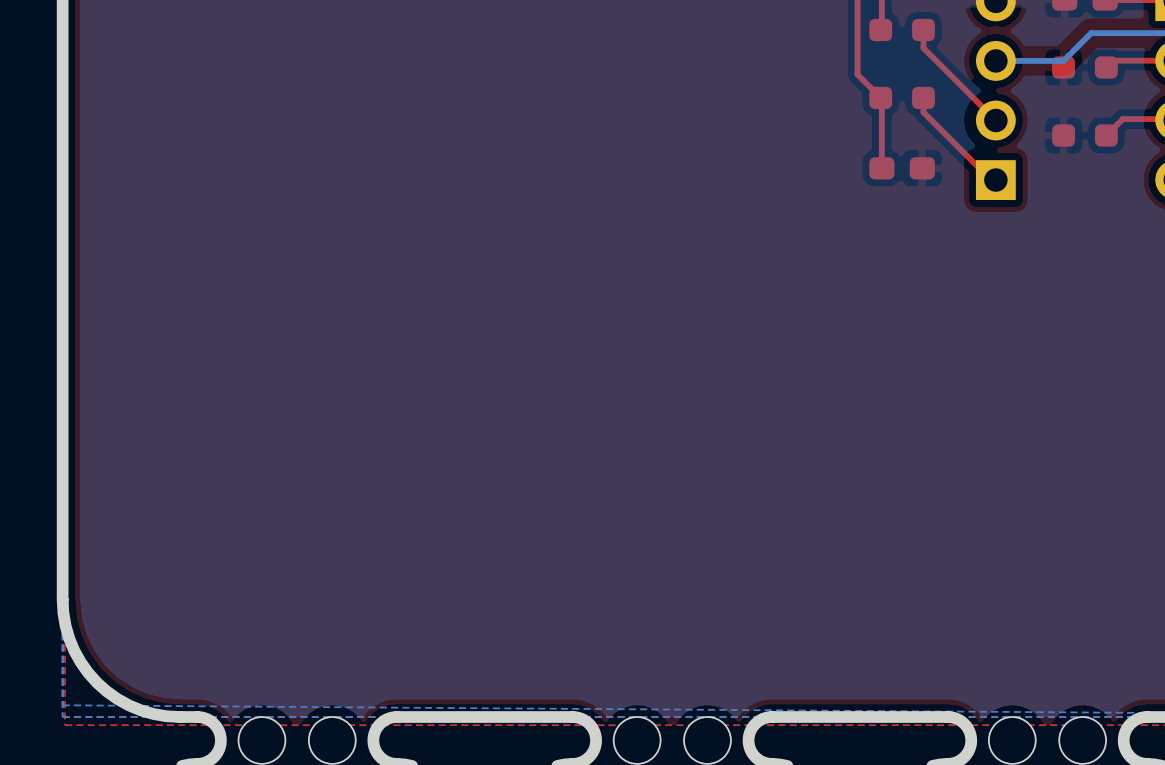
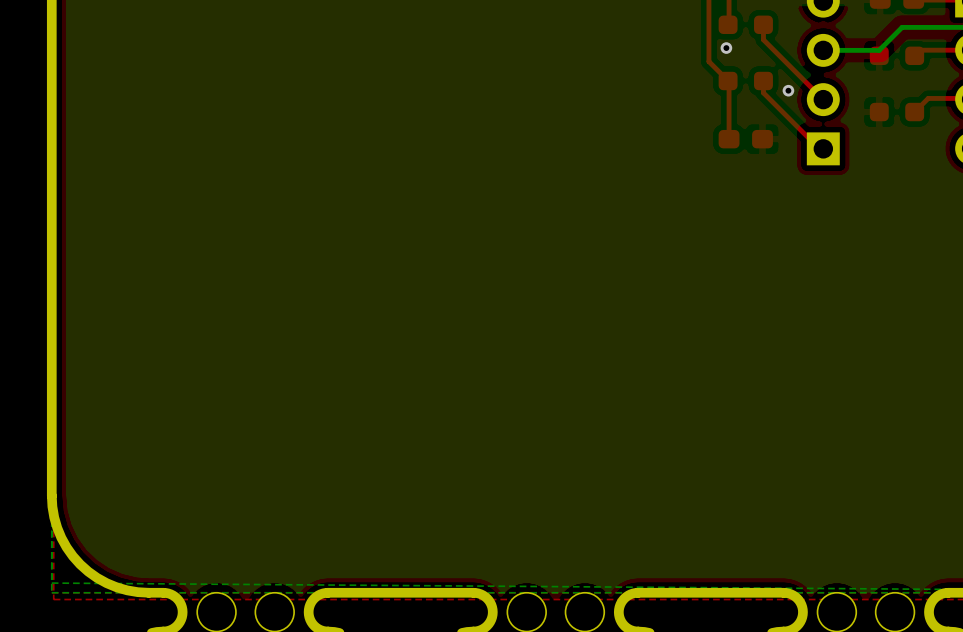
via: none -> (726, 48)
via: none -> (788, 90)

